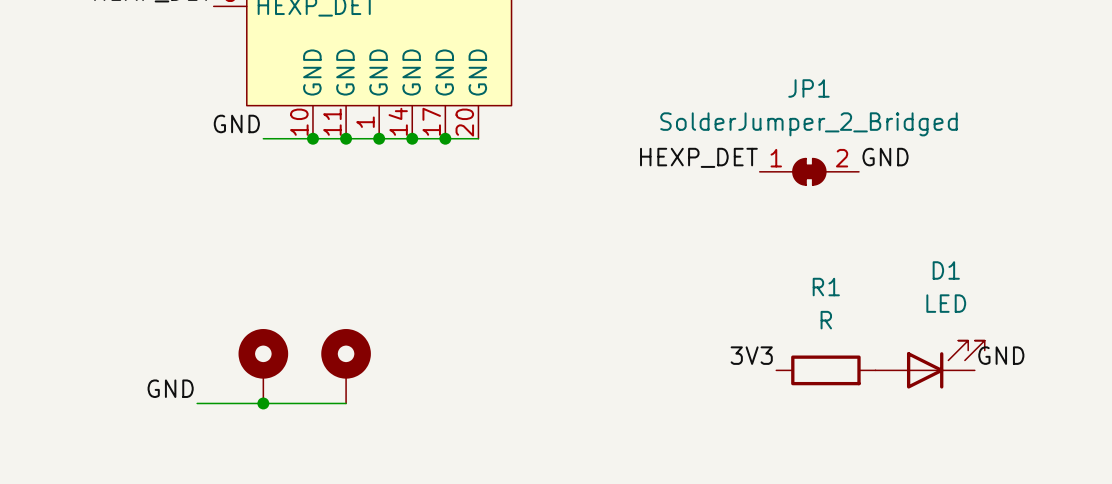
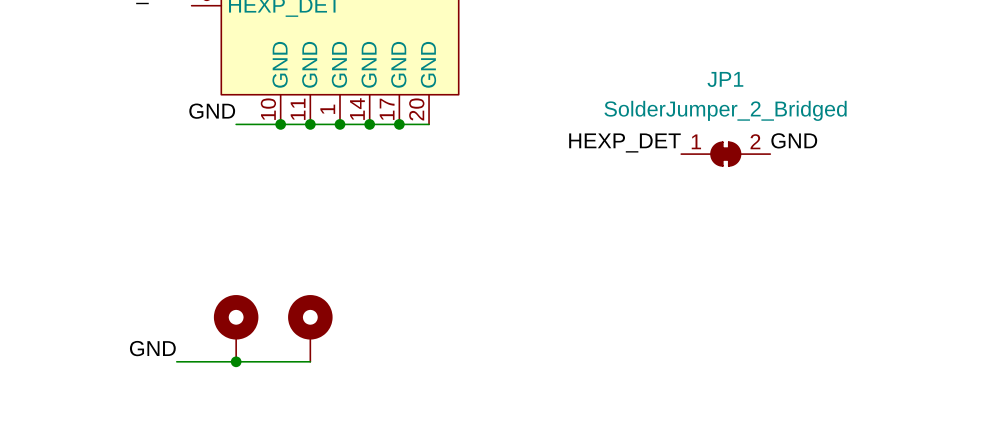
label: 3V3 (751, 355) -> none
label: GND (1001, 355) -> none
D1: LED (930, 364) -> none
R1: R (825, 370) -> none

